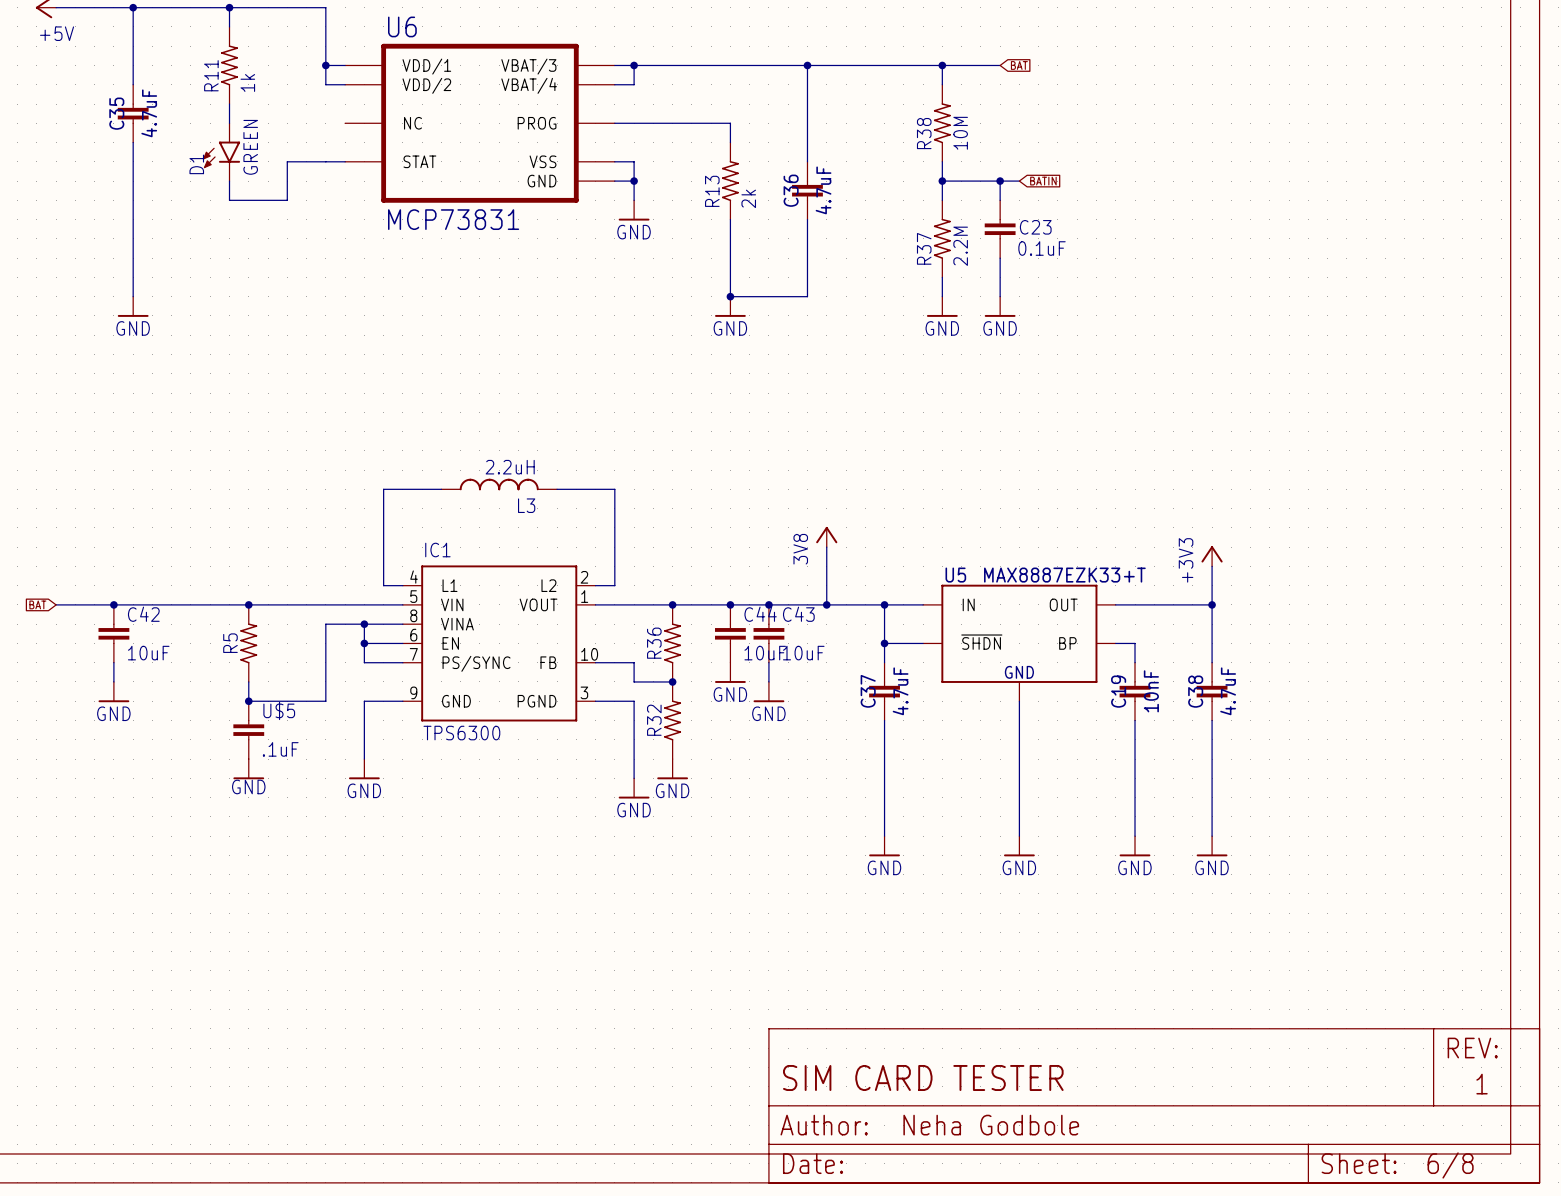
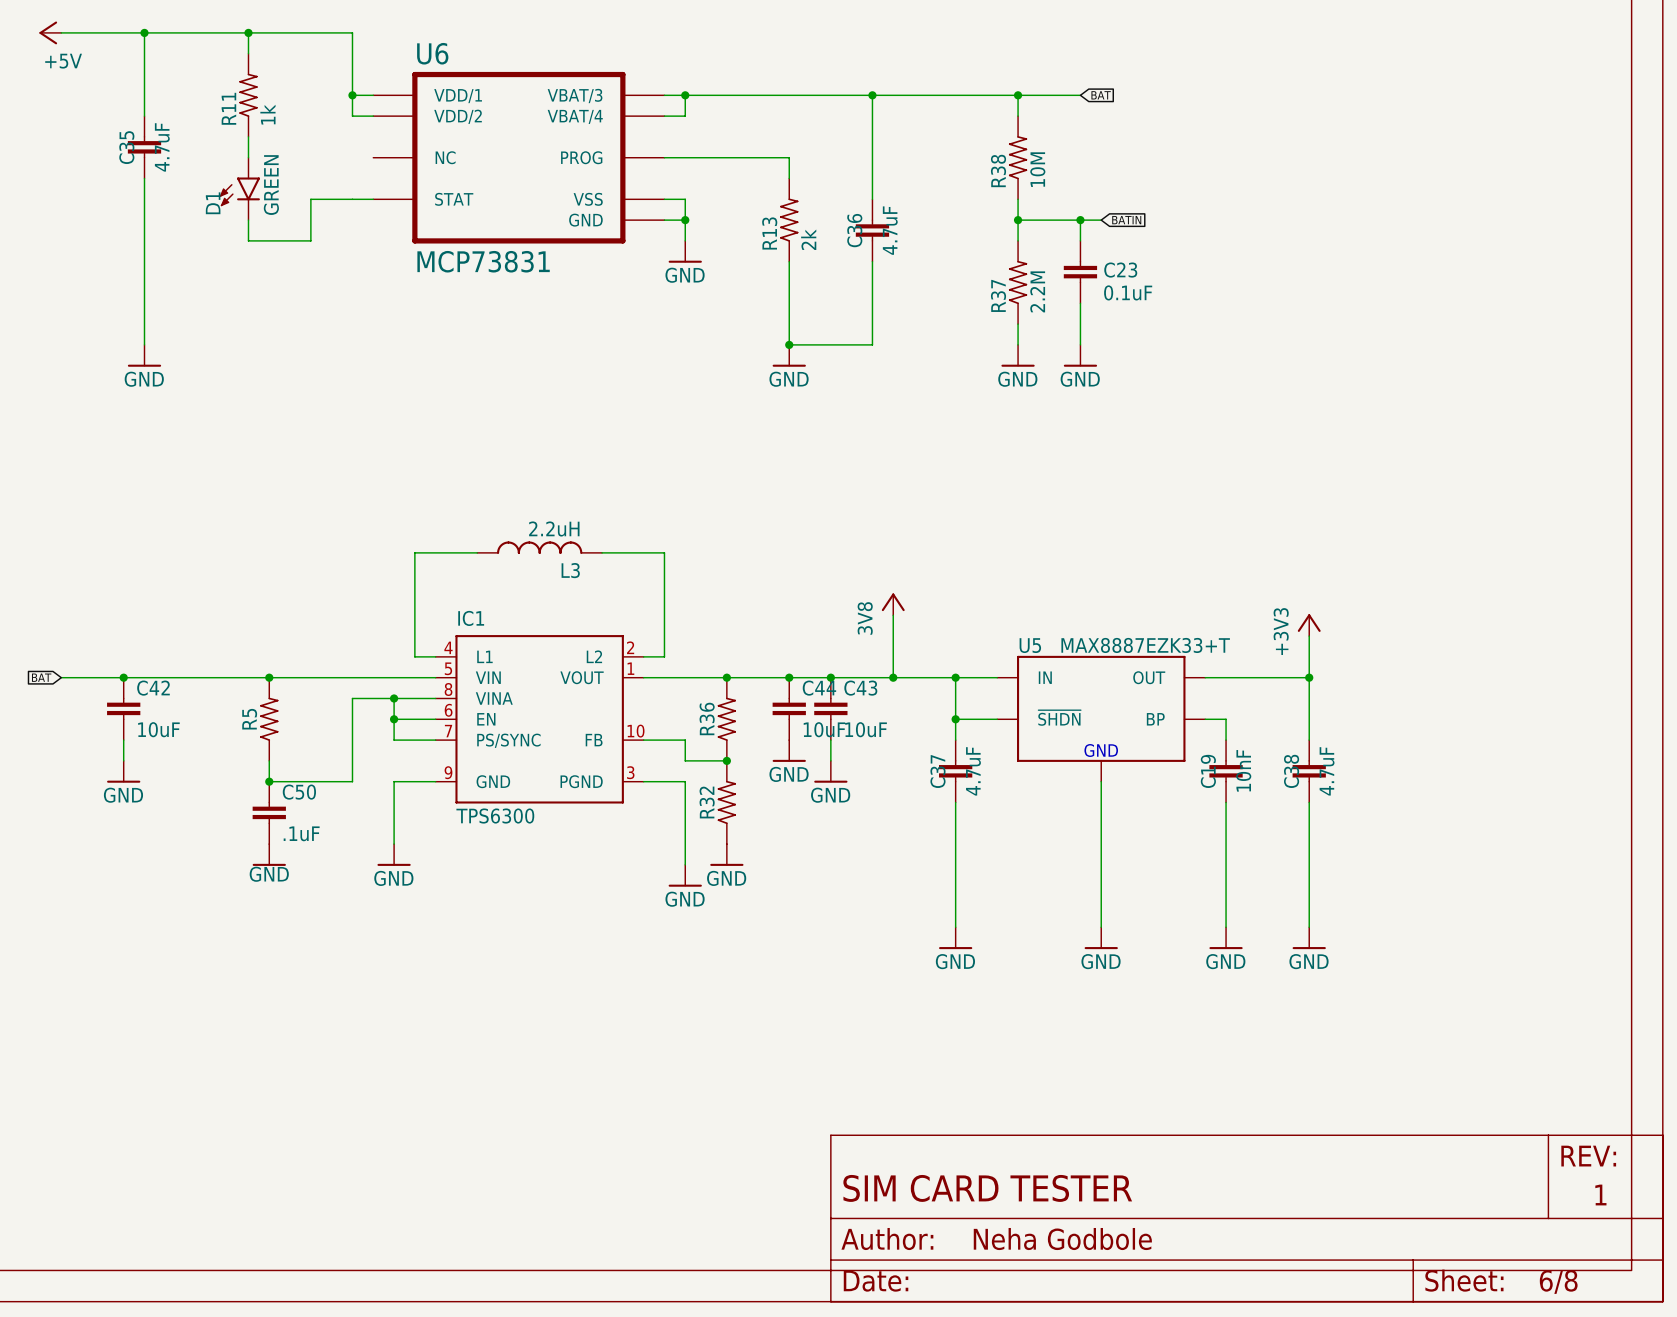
U$5 name: U$5 (279, 710) -> C50 (299, 792)

